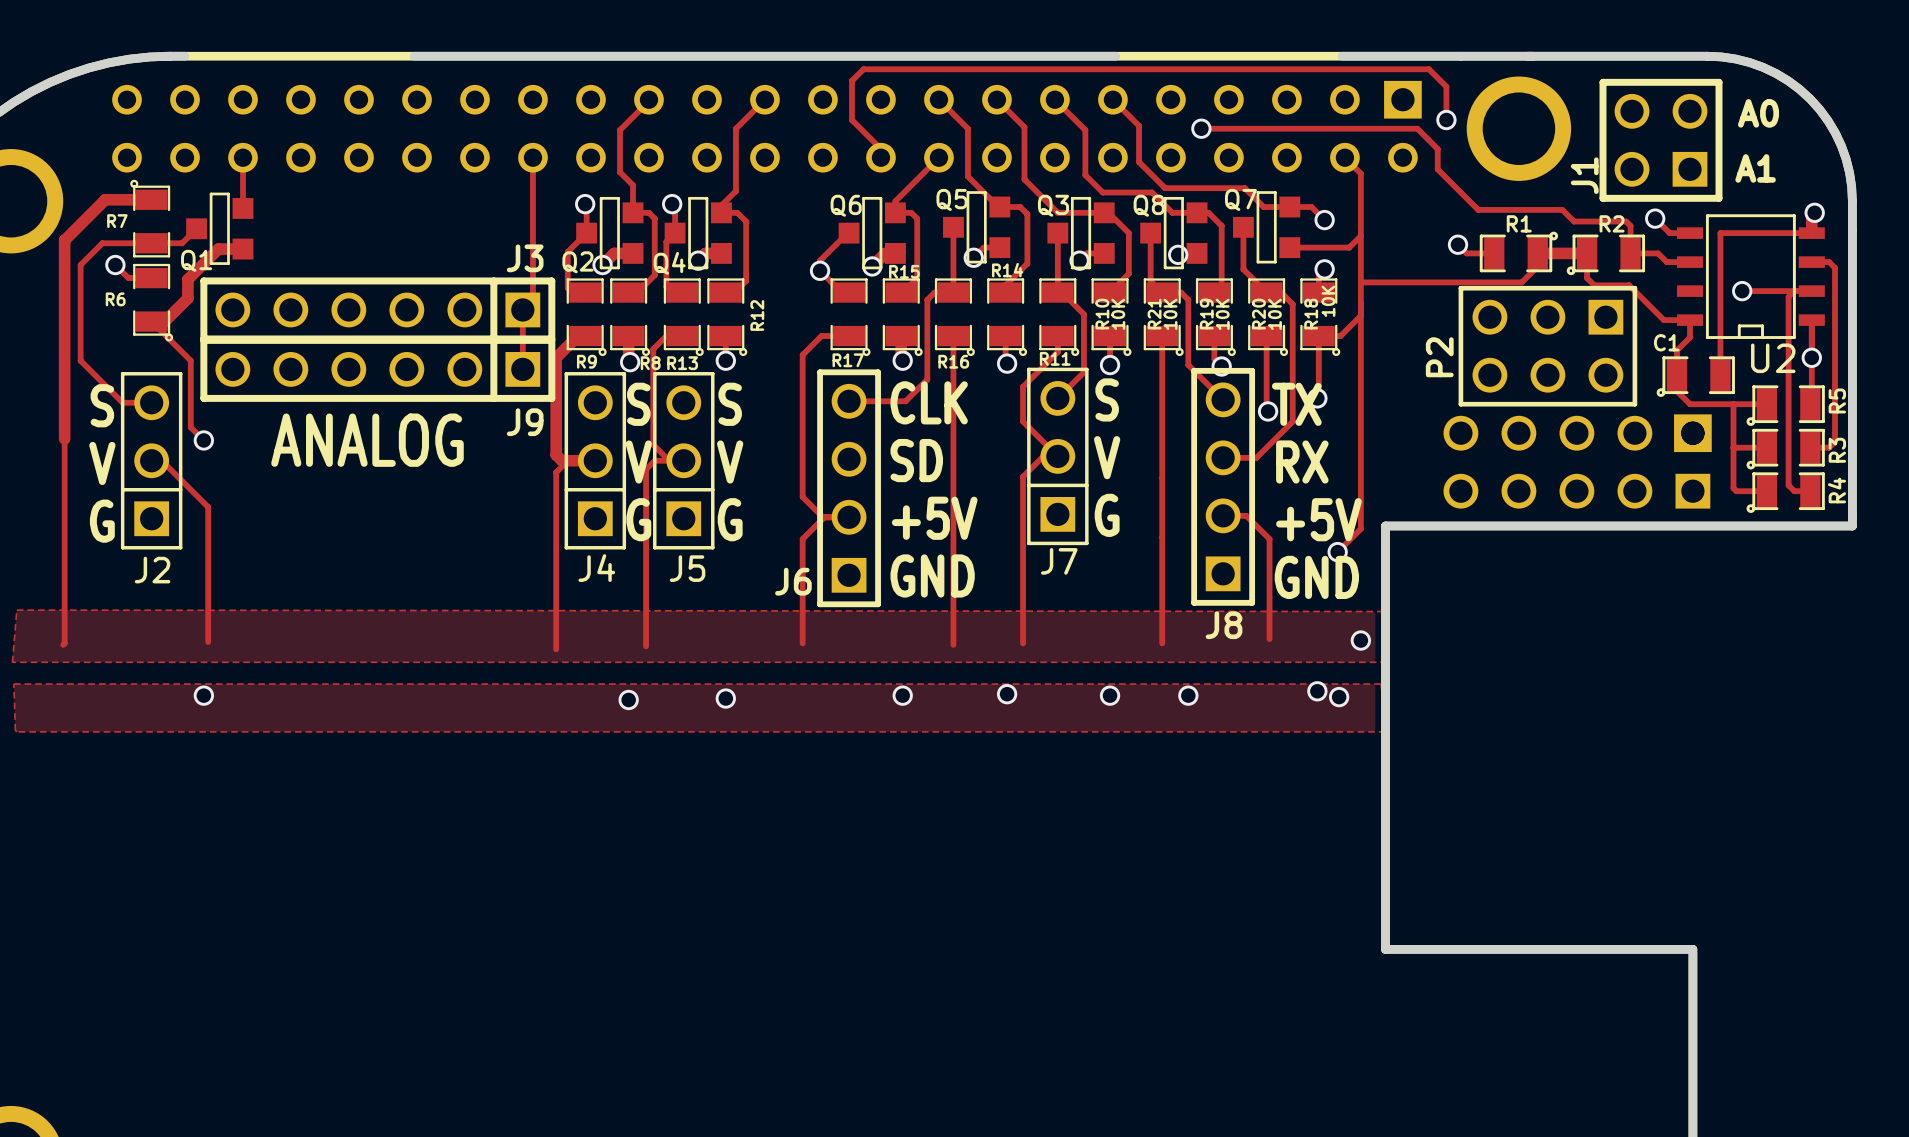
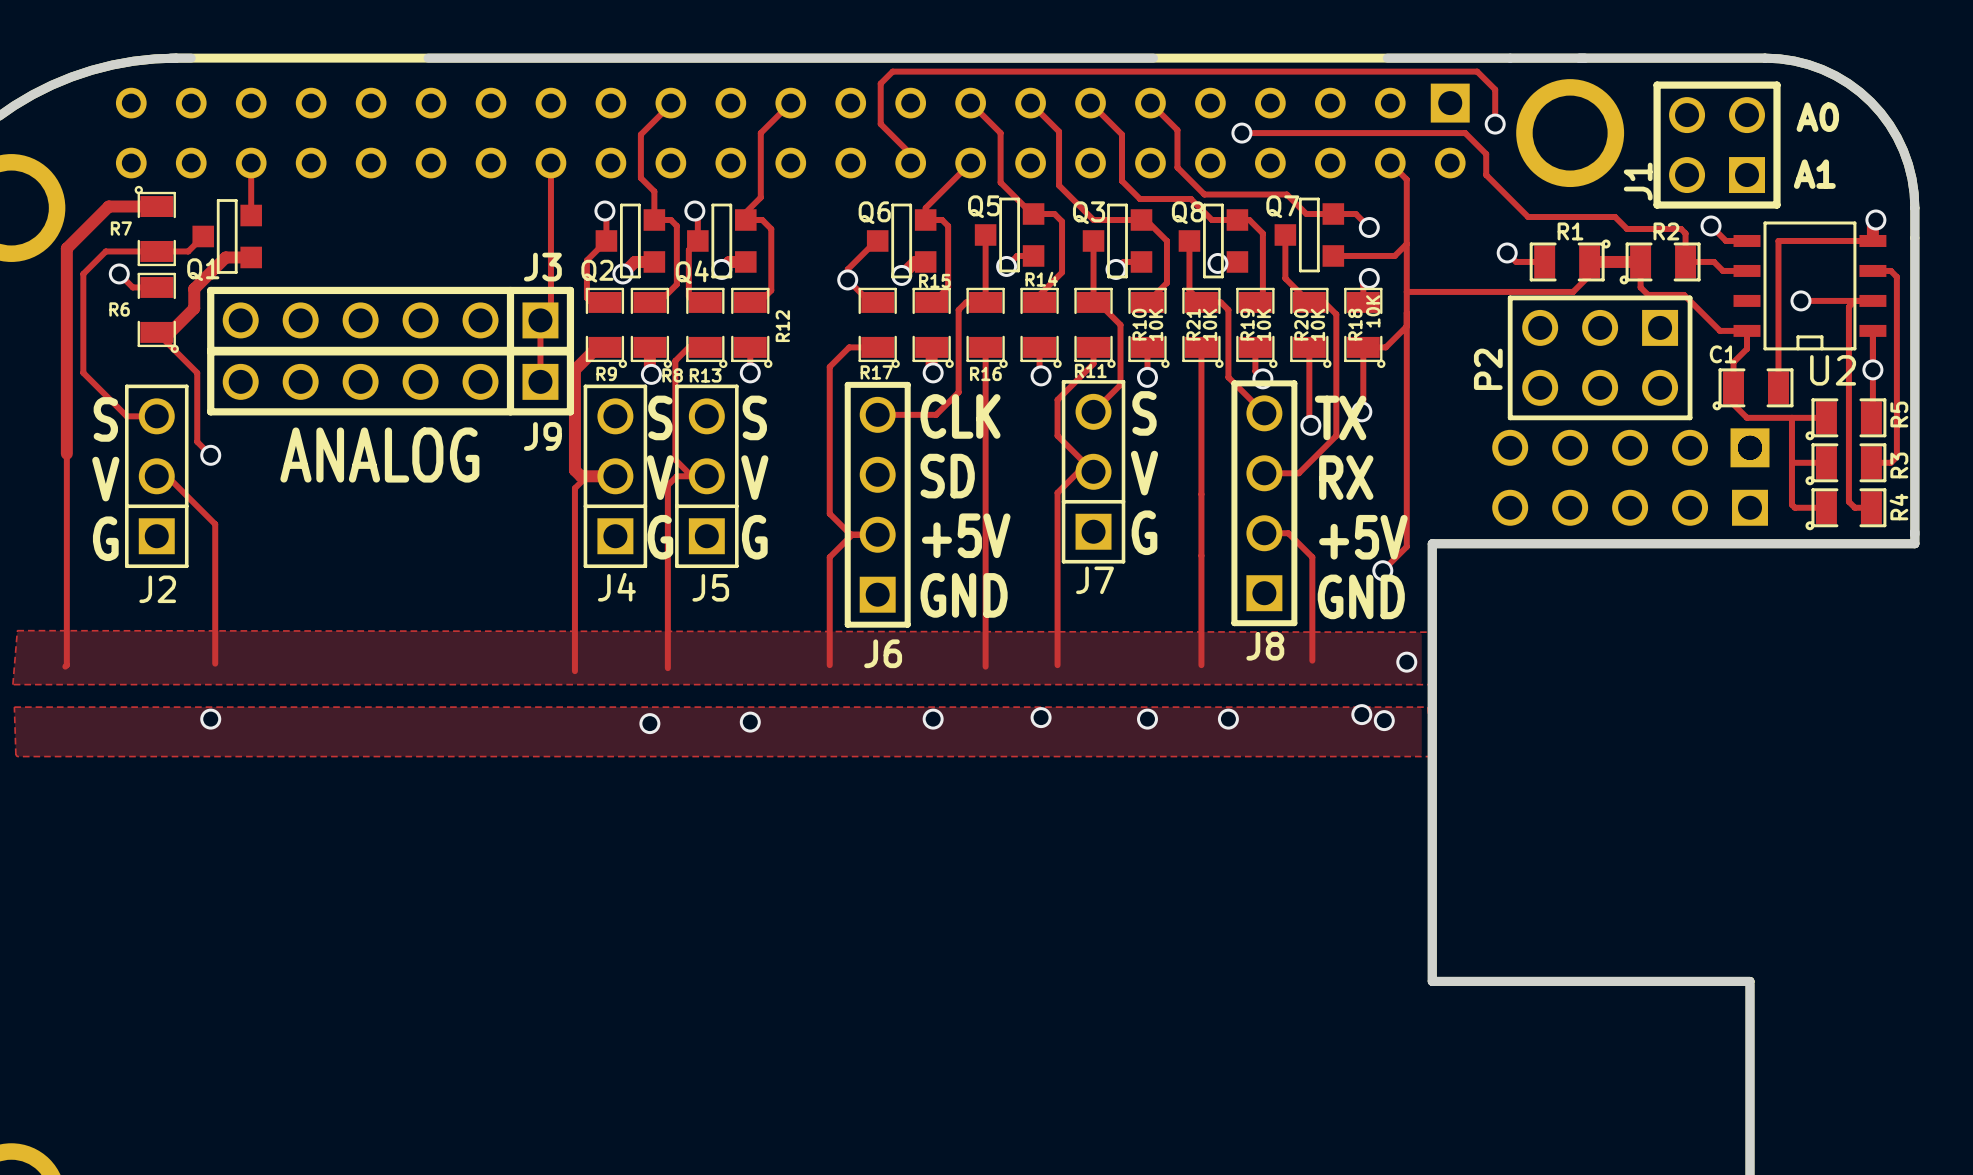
J6 name position: J6 (793, 581) -> J6 (883, 653)

